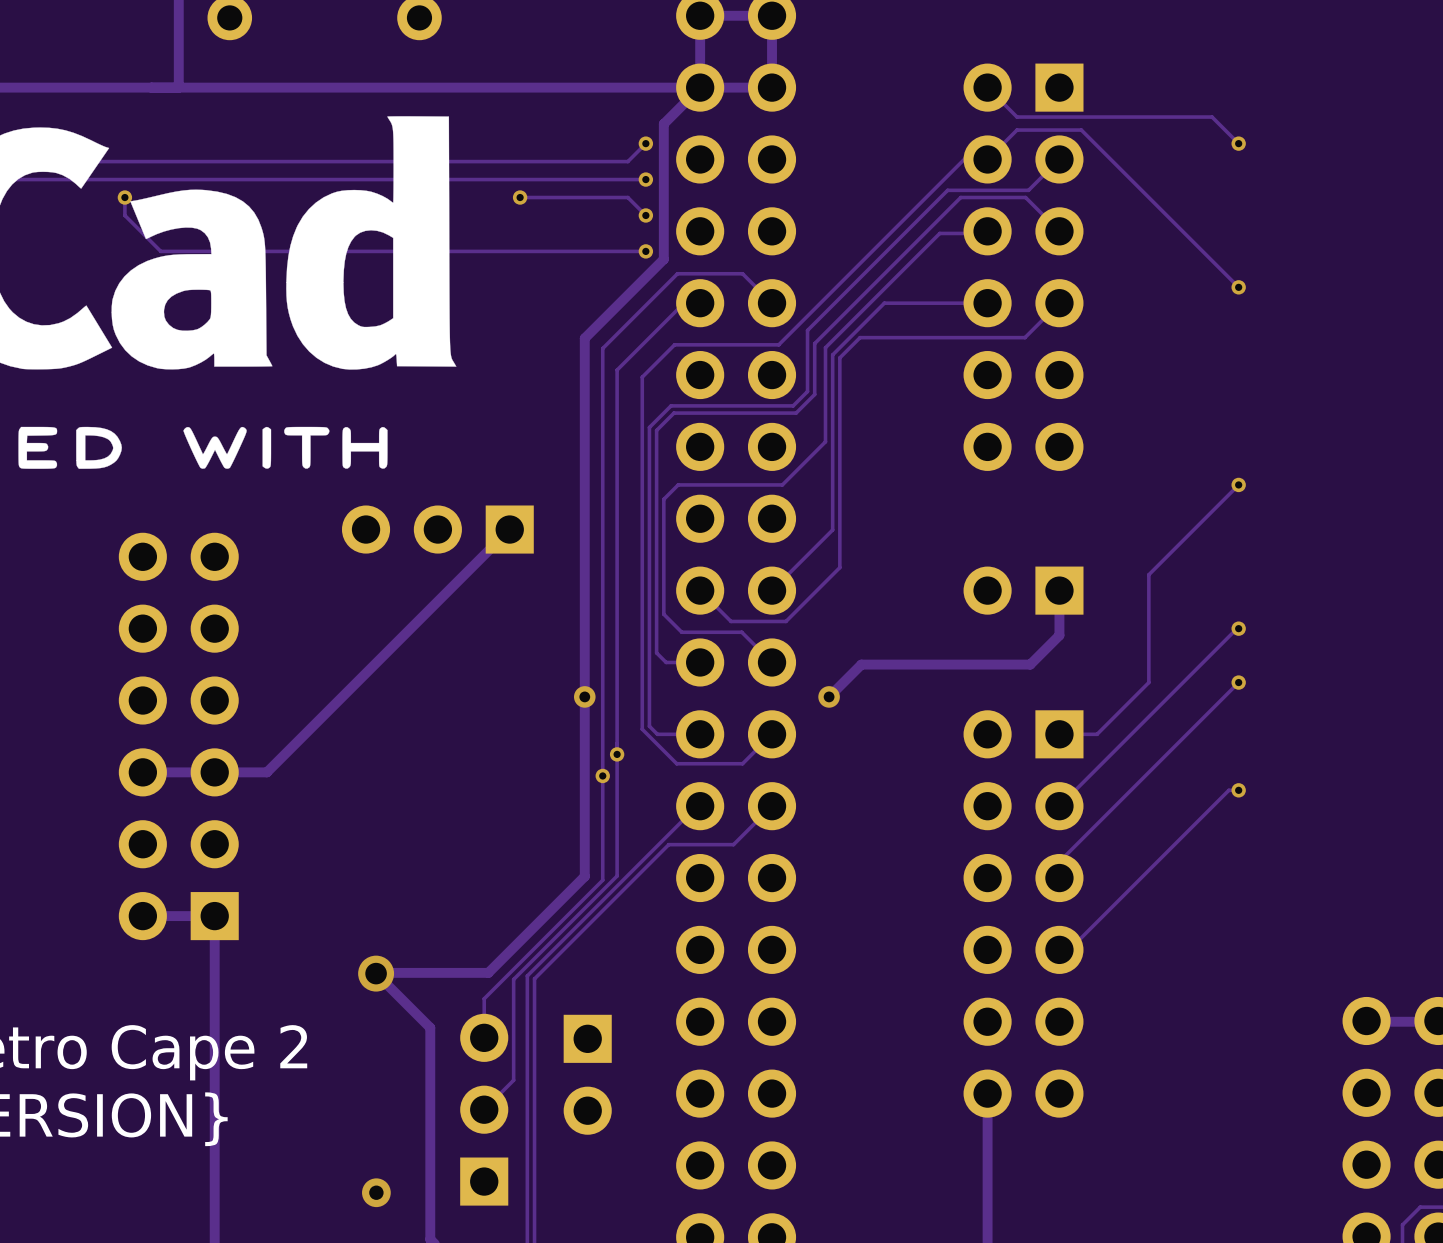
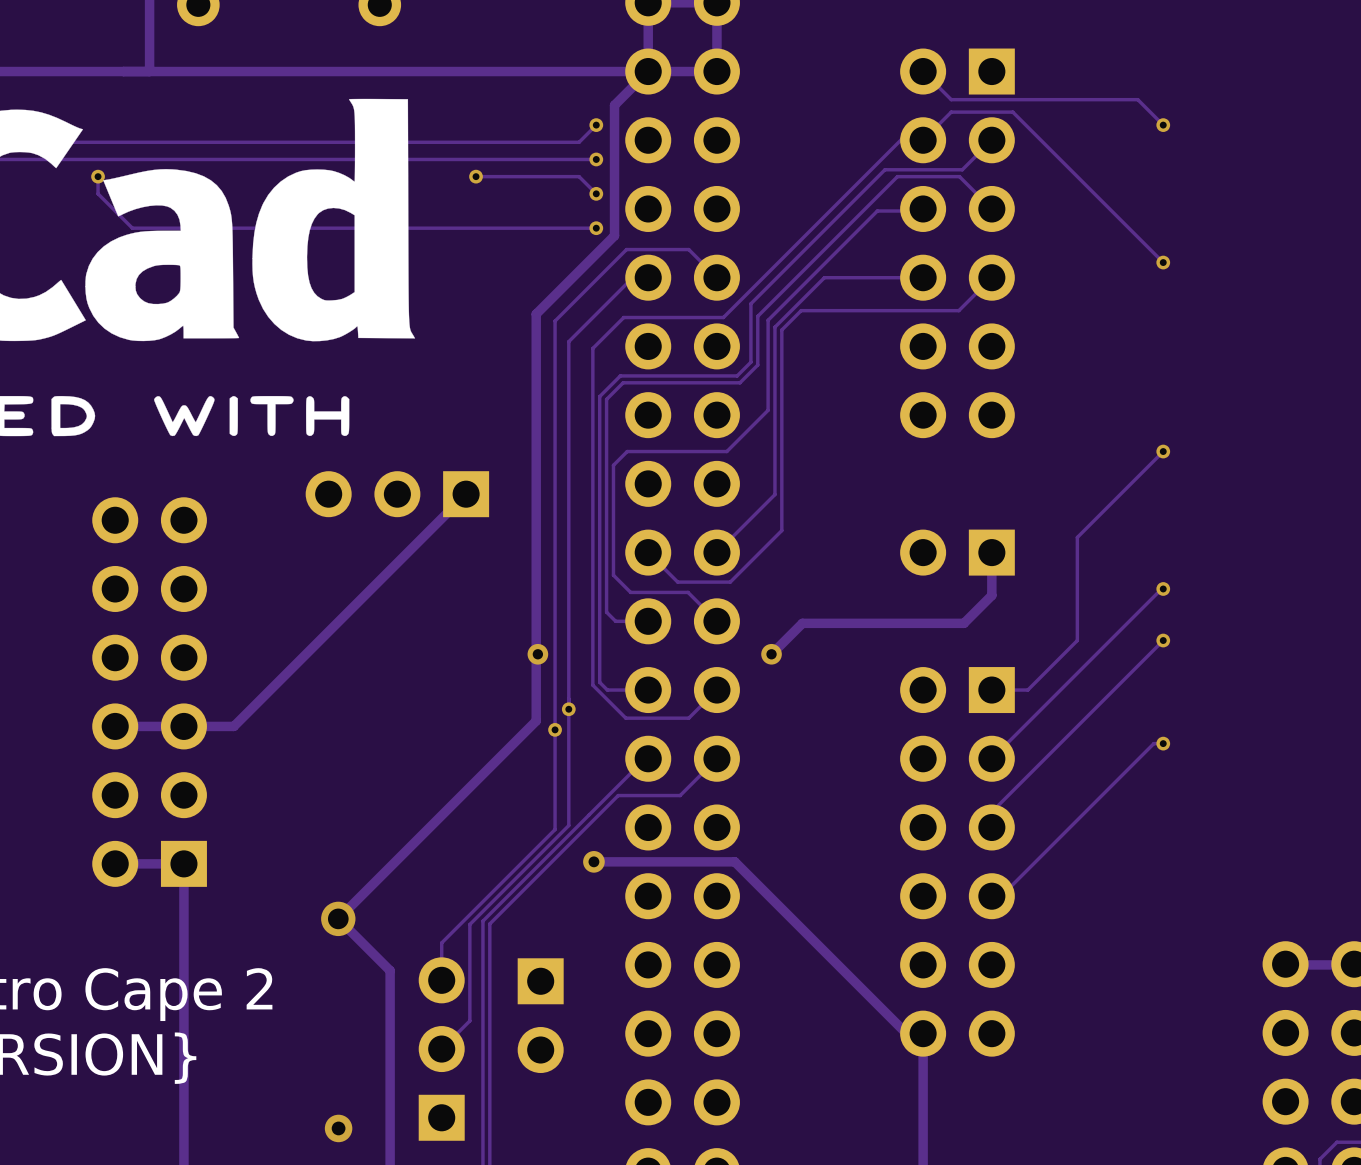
track: (664, 122) (663, 259) (584, 338) (584, 876) (488, 972) (376, 972) -> (614, 105) (614, 235) (536, 314) (536, 720) (338, 918)
track: none -> (593, 861) (734, 861) (906, 1033) (923, 1033)
via: none -> (593, 861)

